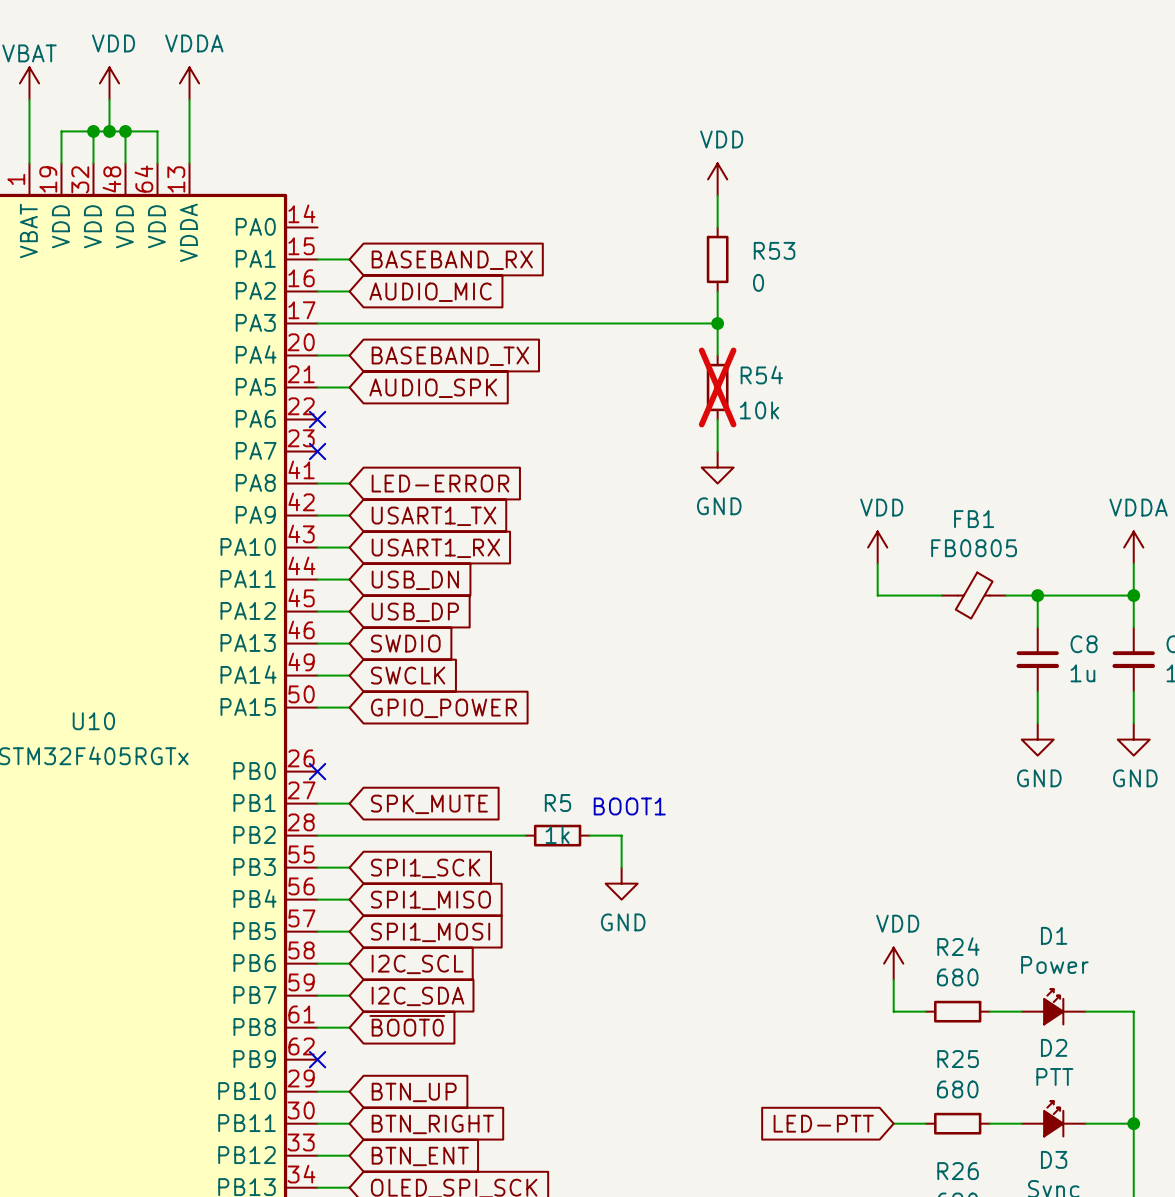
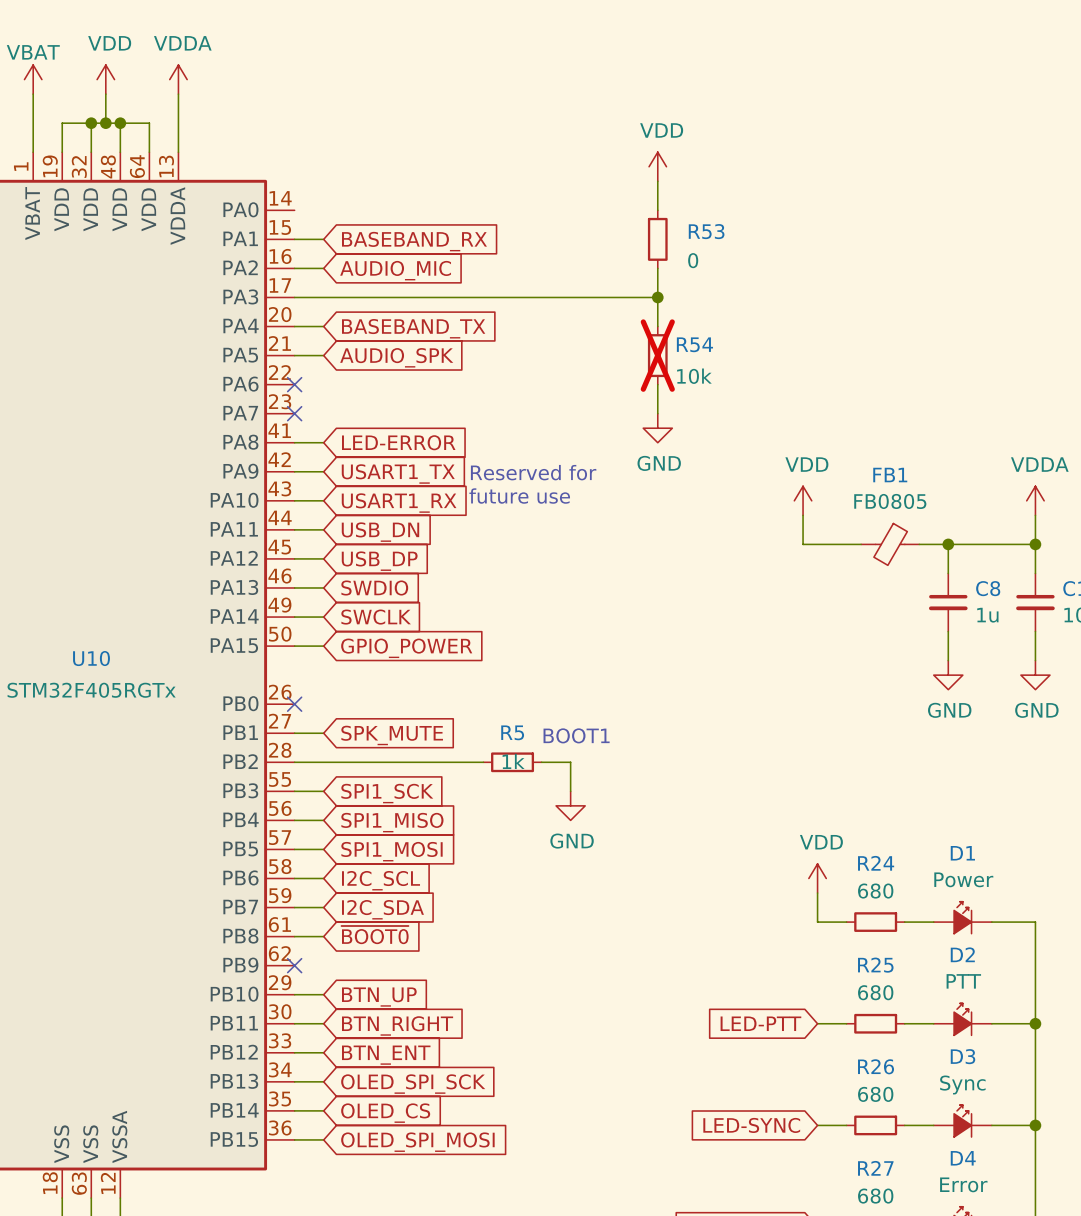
text: none -> Reserved for (533, 472)
text: none -> future use (519, 496)

